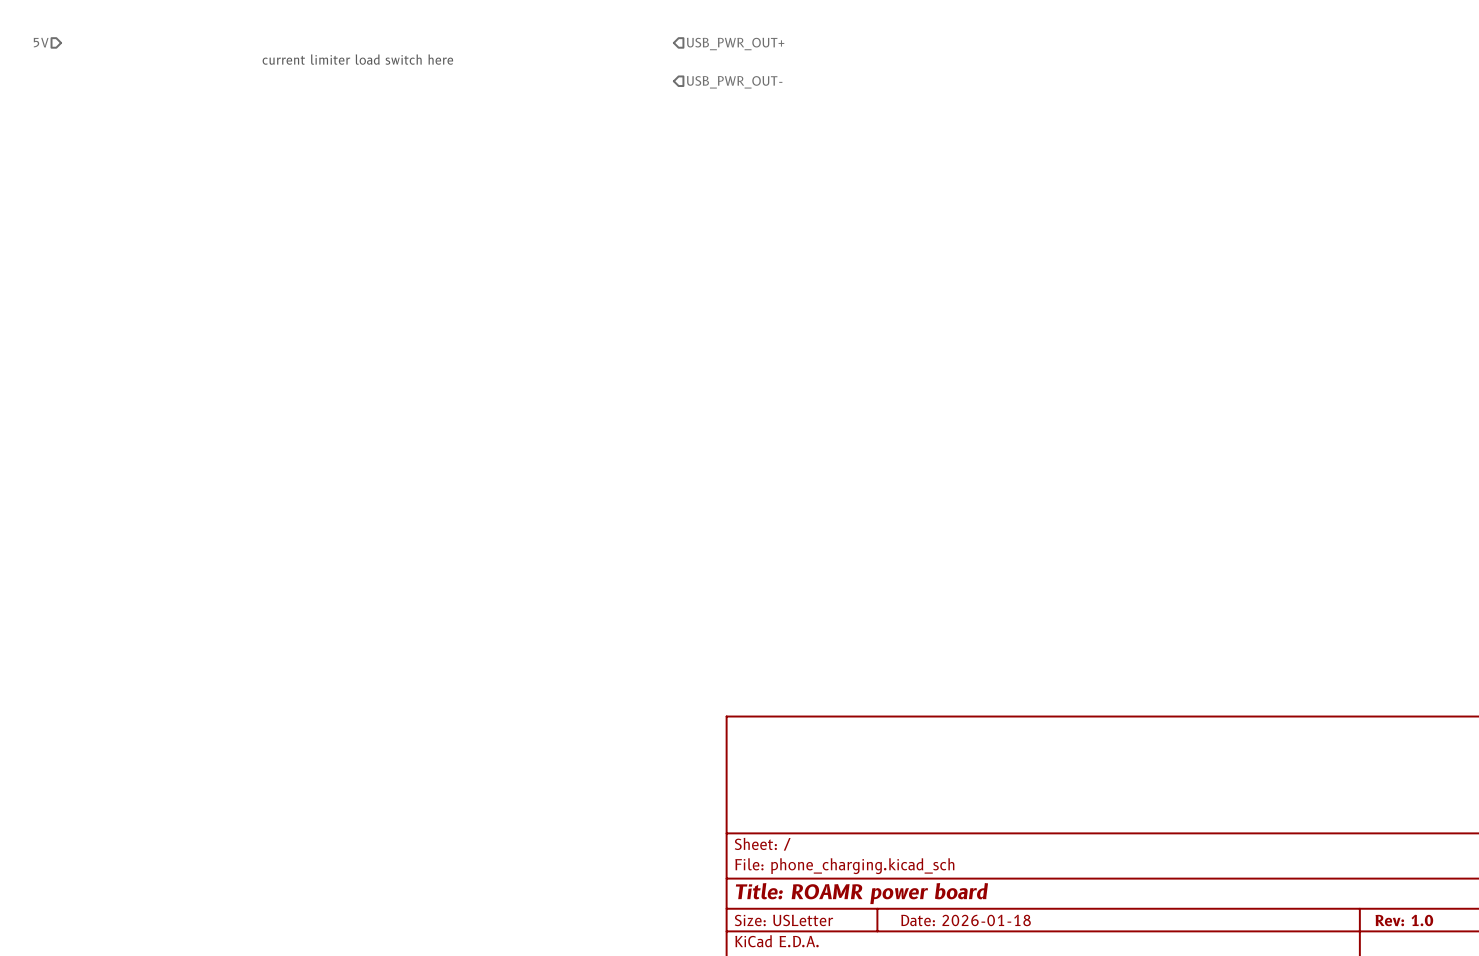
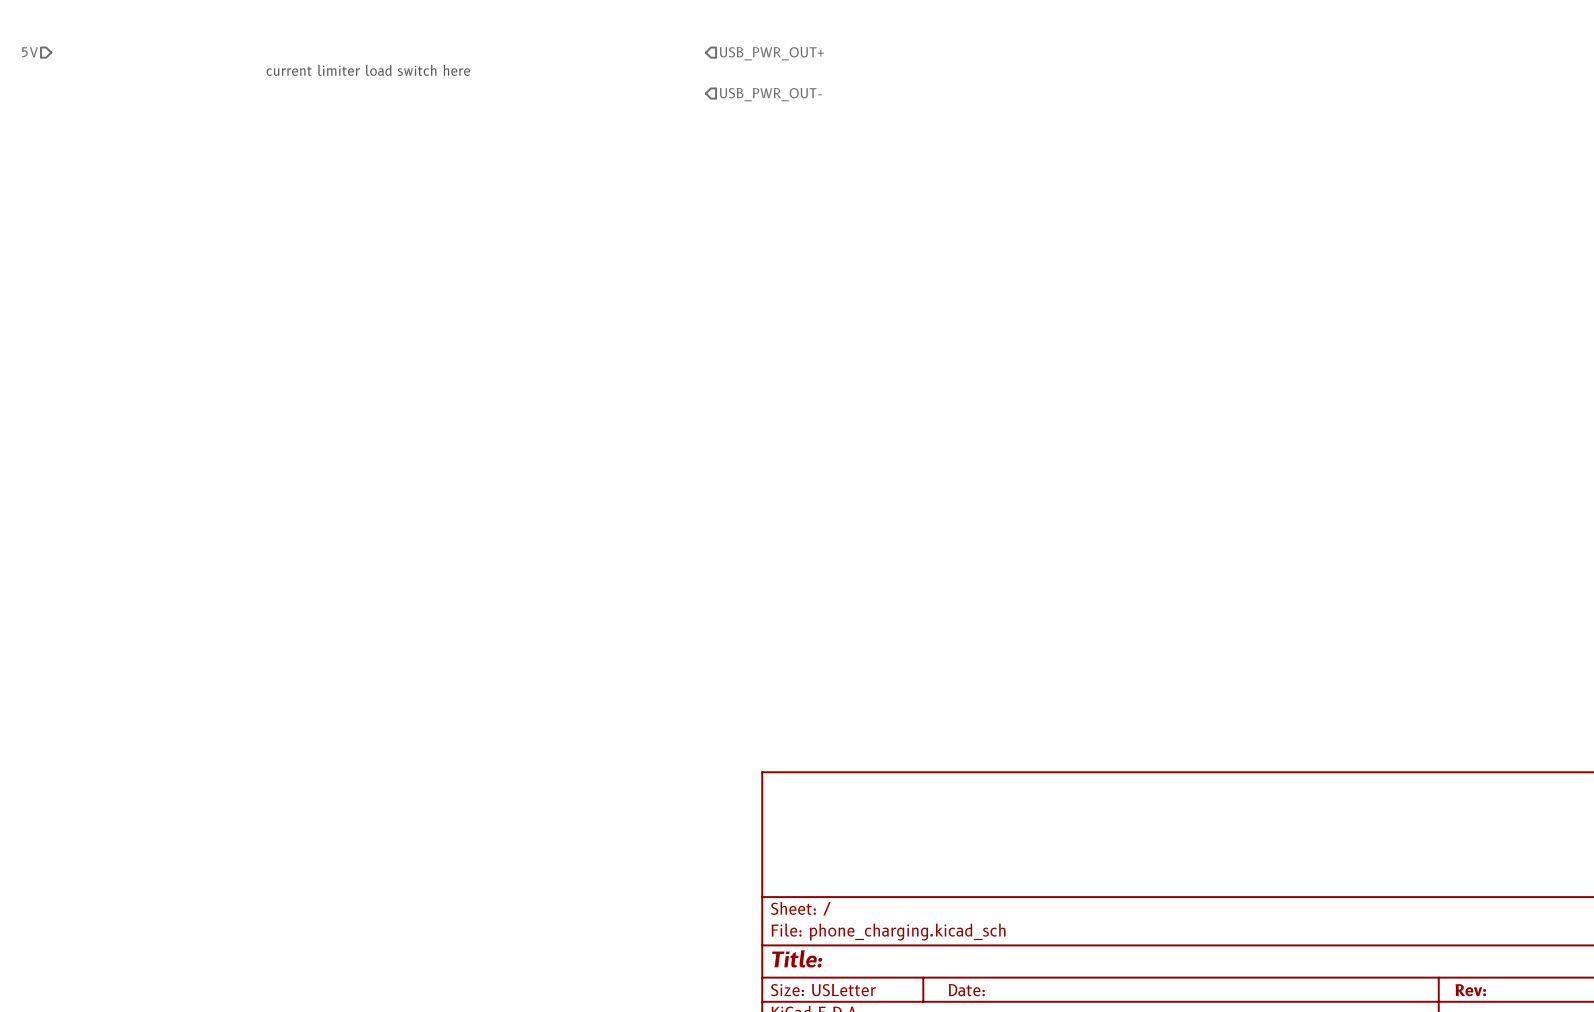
title block: Title: ROAMR power board (861, 893) -> Title: (797, 958)
title block: Date: 2026-01-18 (966, 920) -> Date: (966, 990)
title block: Rev: 1.0 (1404, 920) -> Rev: (1470, 990)

